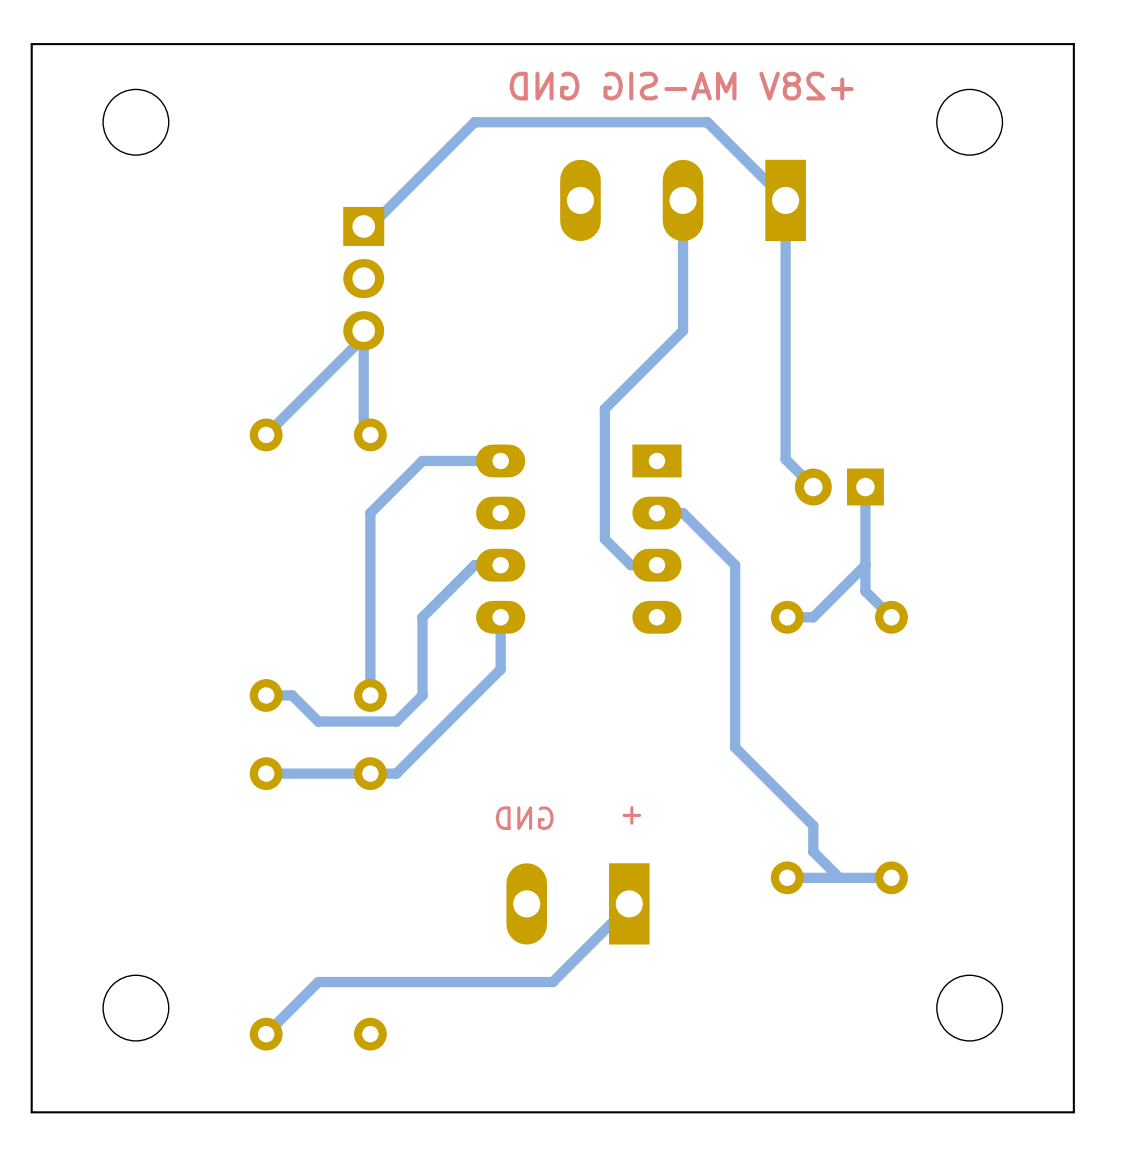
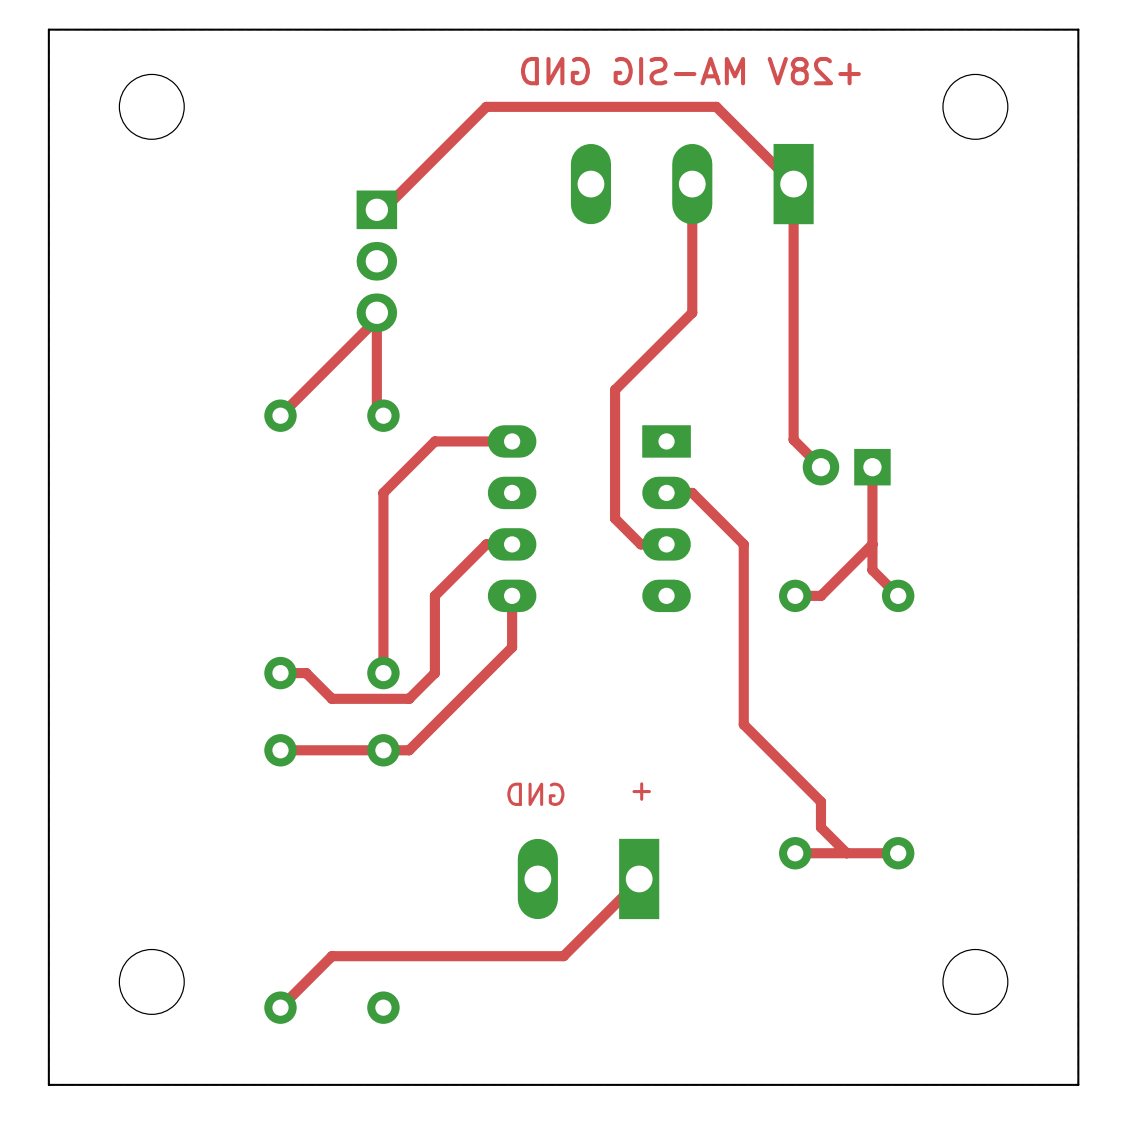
bottom track: (683, 200) (683, 330) (604, 408) (604, 539) (630, 565) (656, 565) -> none
top track: none -> (692, 184) (692, 312) (615, 389) (615, 518) (640, 544) (666, 544)
bottom track: (363, 226) (370, 226) (474, 122) (707, 122) (785, 200) (785, 459) (813, 487) -> none
top track: none -> (376, 209) (383, 209) (486, 106) (716, 106) (793, 184) (793, 439) (820, 467)
bottom track: (363, 330) (363, 428) (370, 434) -> none
top track: none -> (376, 312) (376, 409) (383, 415)
bottom track: (363, 337) (266, 434) -> none
top track: none -> (376, 319) (280, 415)
bottom track: (500, 460) (422, 460) (370, 513) (370, 695) -> none
top track: none -> (512, 441) (434, 441) (383, 492) (383, 673)
bottom track: (865, 487) (865, 591) (891, 617) -> none
top track: none -> (872, 467) (872, 570) (898, 595)
bottom track: (656, 513) (683, 513) (735, 565) (735, 747) (813, 825) (813, 851) (839, 877) -> none
top track: none -> (666, 492) (692, 492) (743, 544) (743, 724) (820, 801) (820, 827) (846, 853)
bottom track: (500, 565) (474, 565) (422, 617) (422, 695) (396, 721) (318, 721) (292, 695) (266, 695) -> none
top track: none -> (512, 544) (486, 544) (434, 595) (434, 673) (409, 698) (331, 698) (306, 673) (280, 673)
bottom track: (865, 565) (813, 617) (787, 617) -> none
top track: none -> (872, 544) (820, 595) (795, 595)
bottom track: (500, 617) (500, 669) (396, 773) (266, 773) -> none
top track: none -> (512, 595) (512, 647) (409, 750) (280, 750)
bottom track: (891, 877) (787, 877) -> none
top track: none -> (898, 853) (795, 853)
bottom track: (629, 903) (552, 982) (318, 982) (266, 1034) -> none
top track: none -> (639, 878) (563, 956) (331, 956) (280, 1007)

